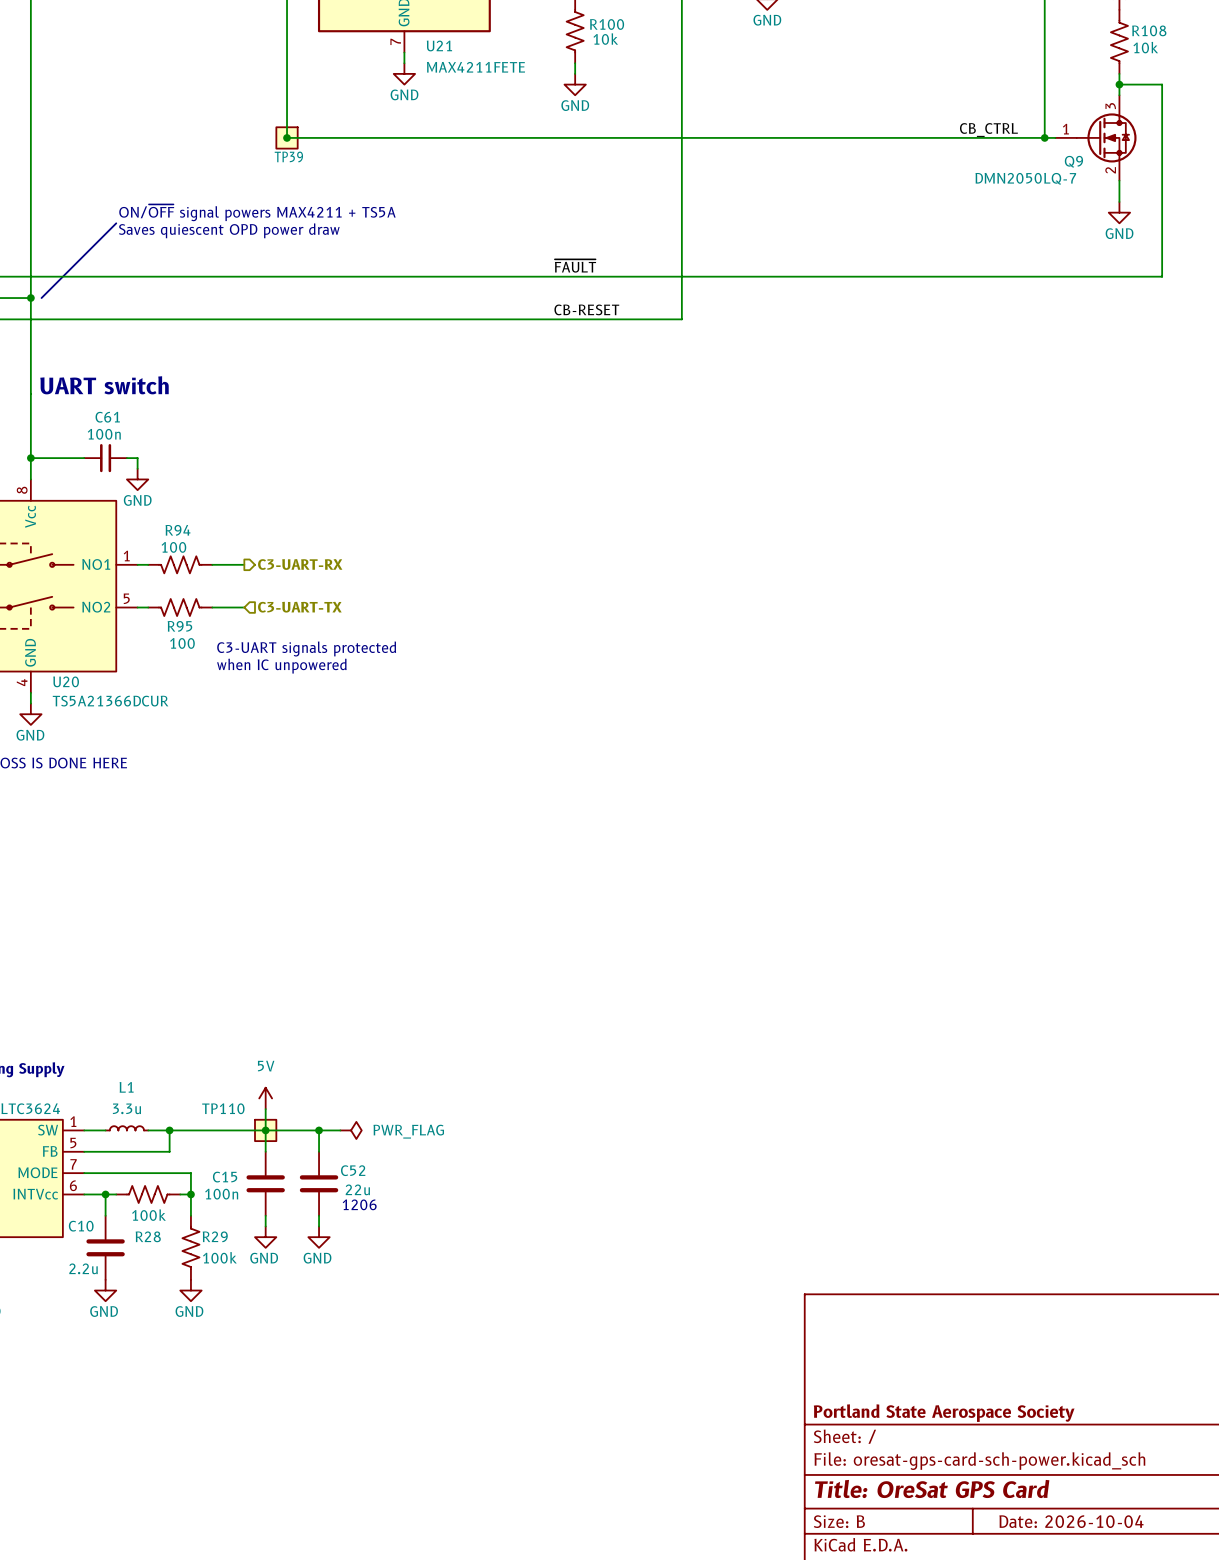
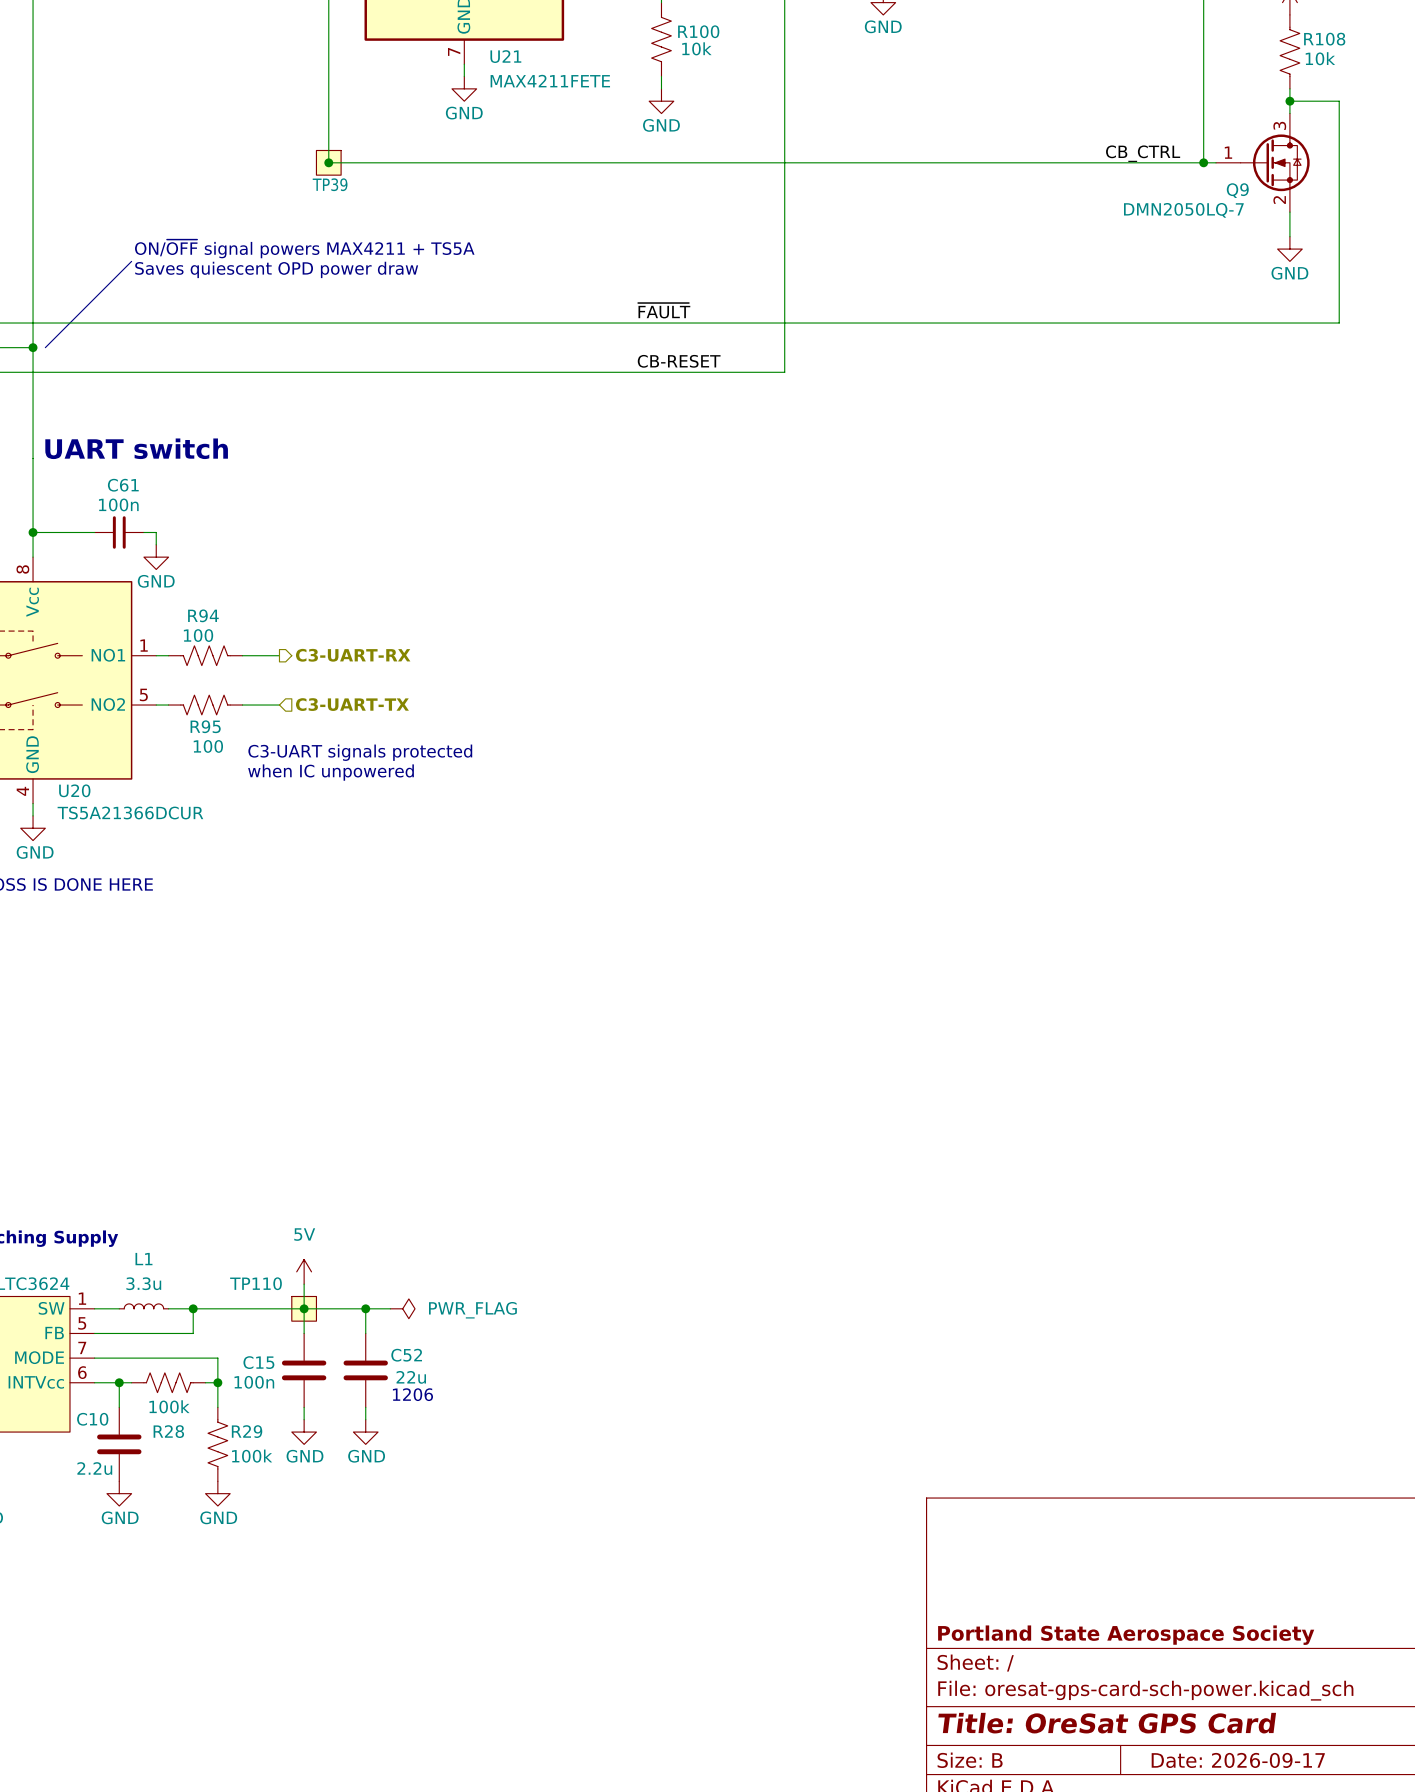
title block: Date: 2026-10-04 (1071, 1521) -> Date: 2026-09-17 (1238, 1760)

